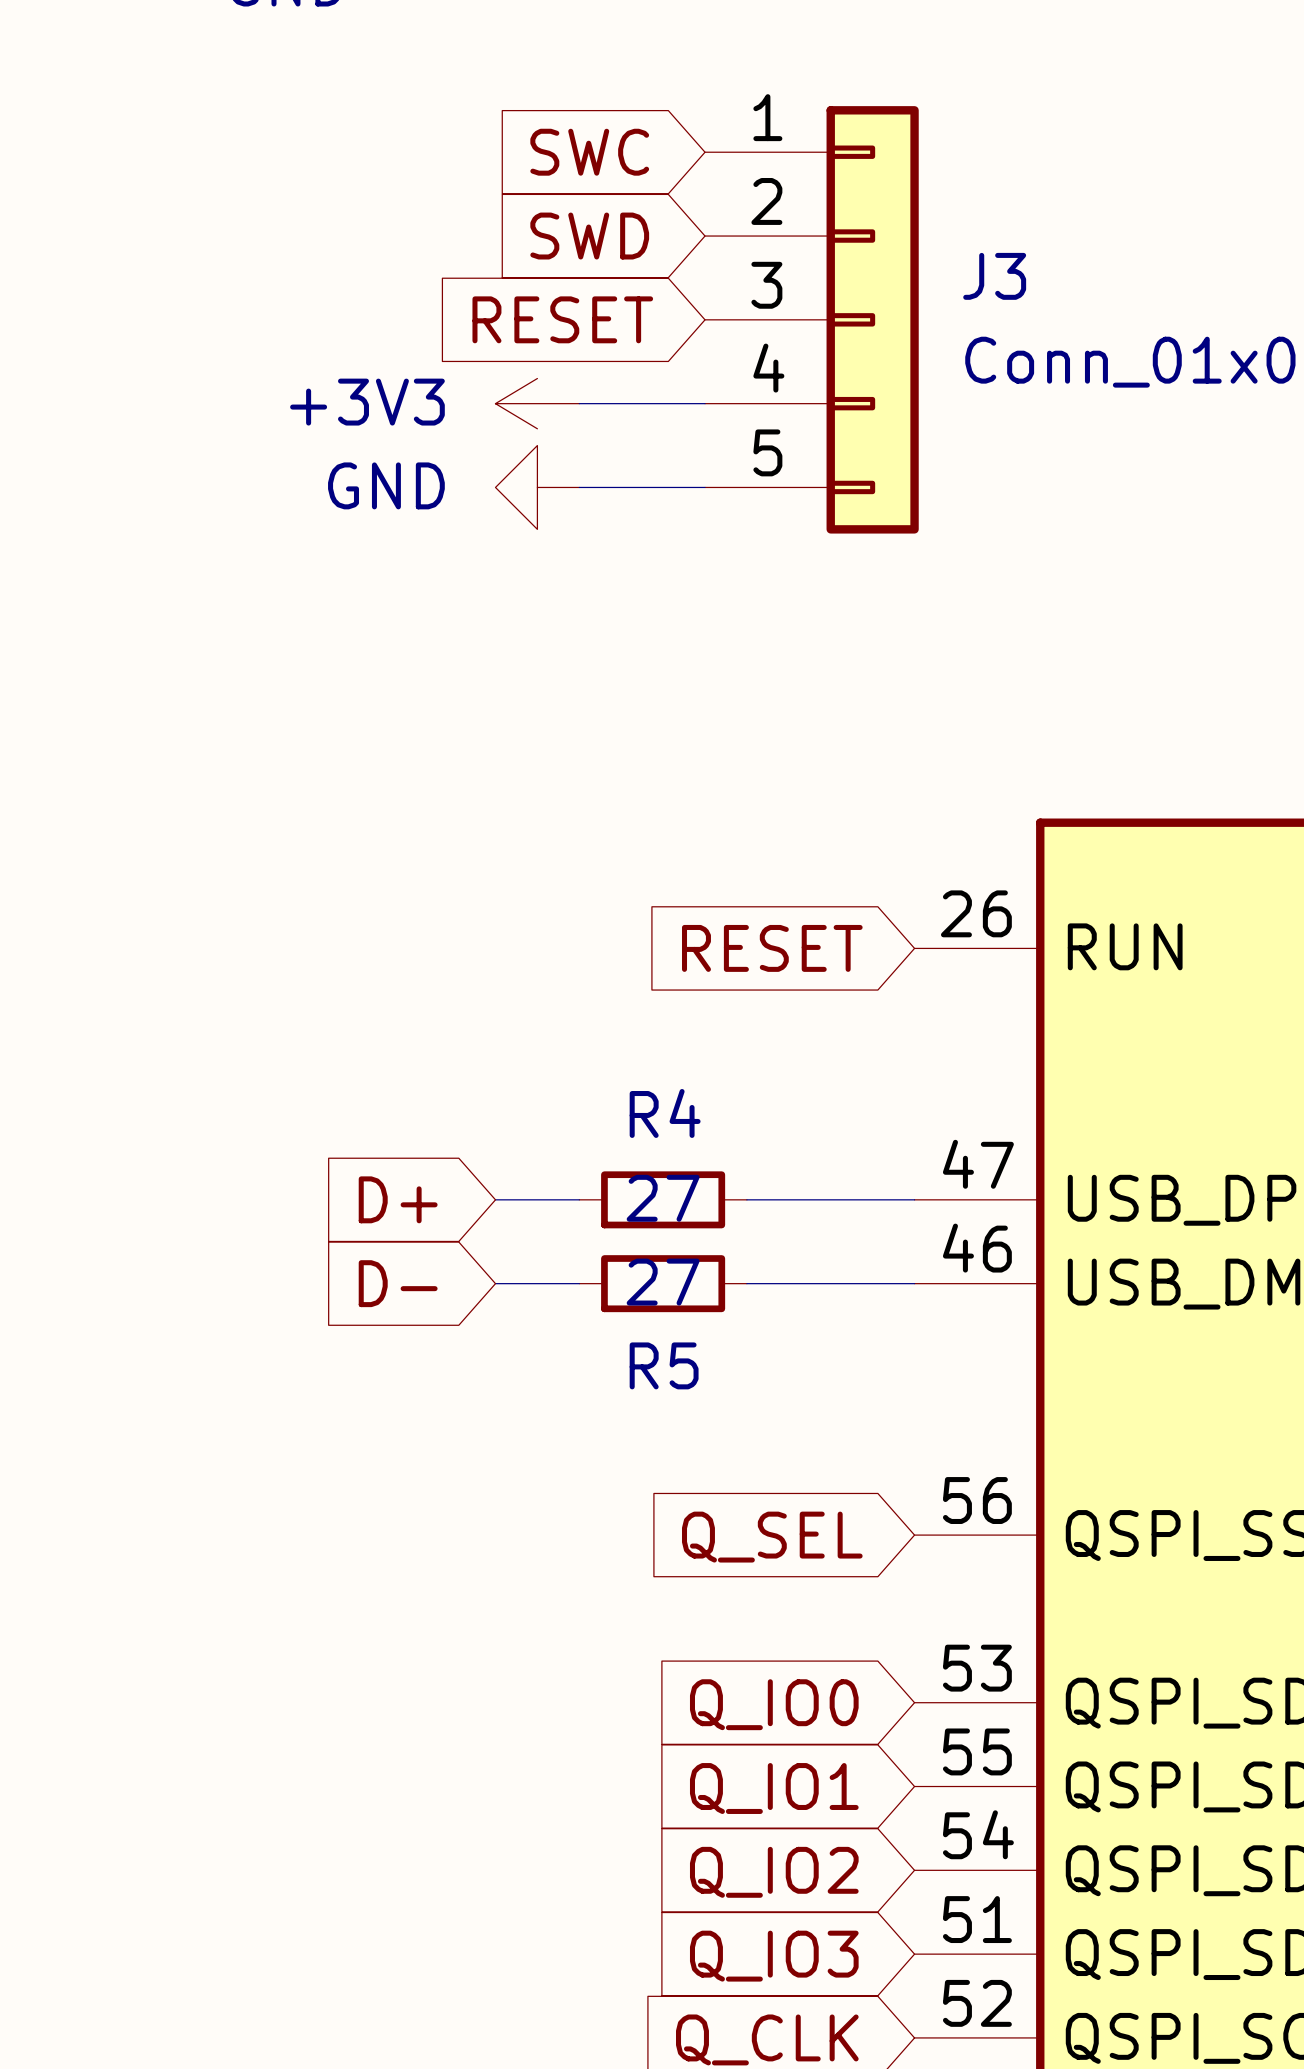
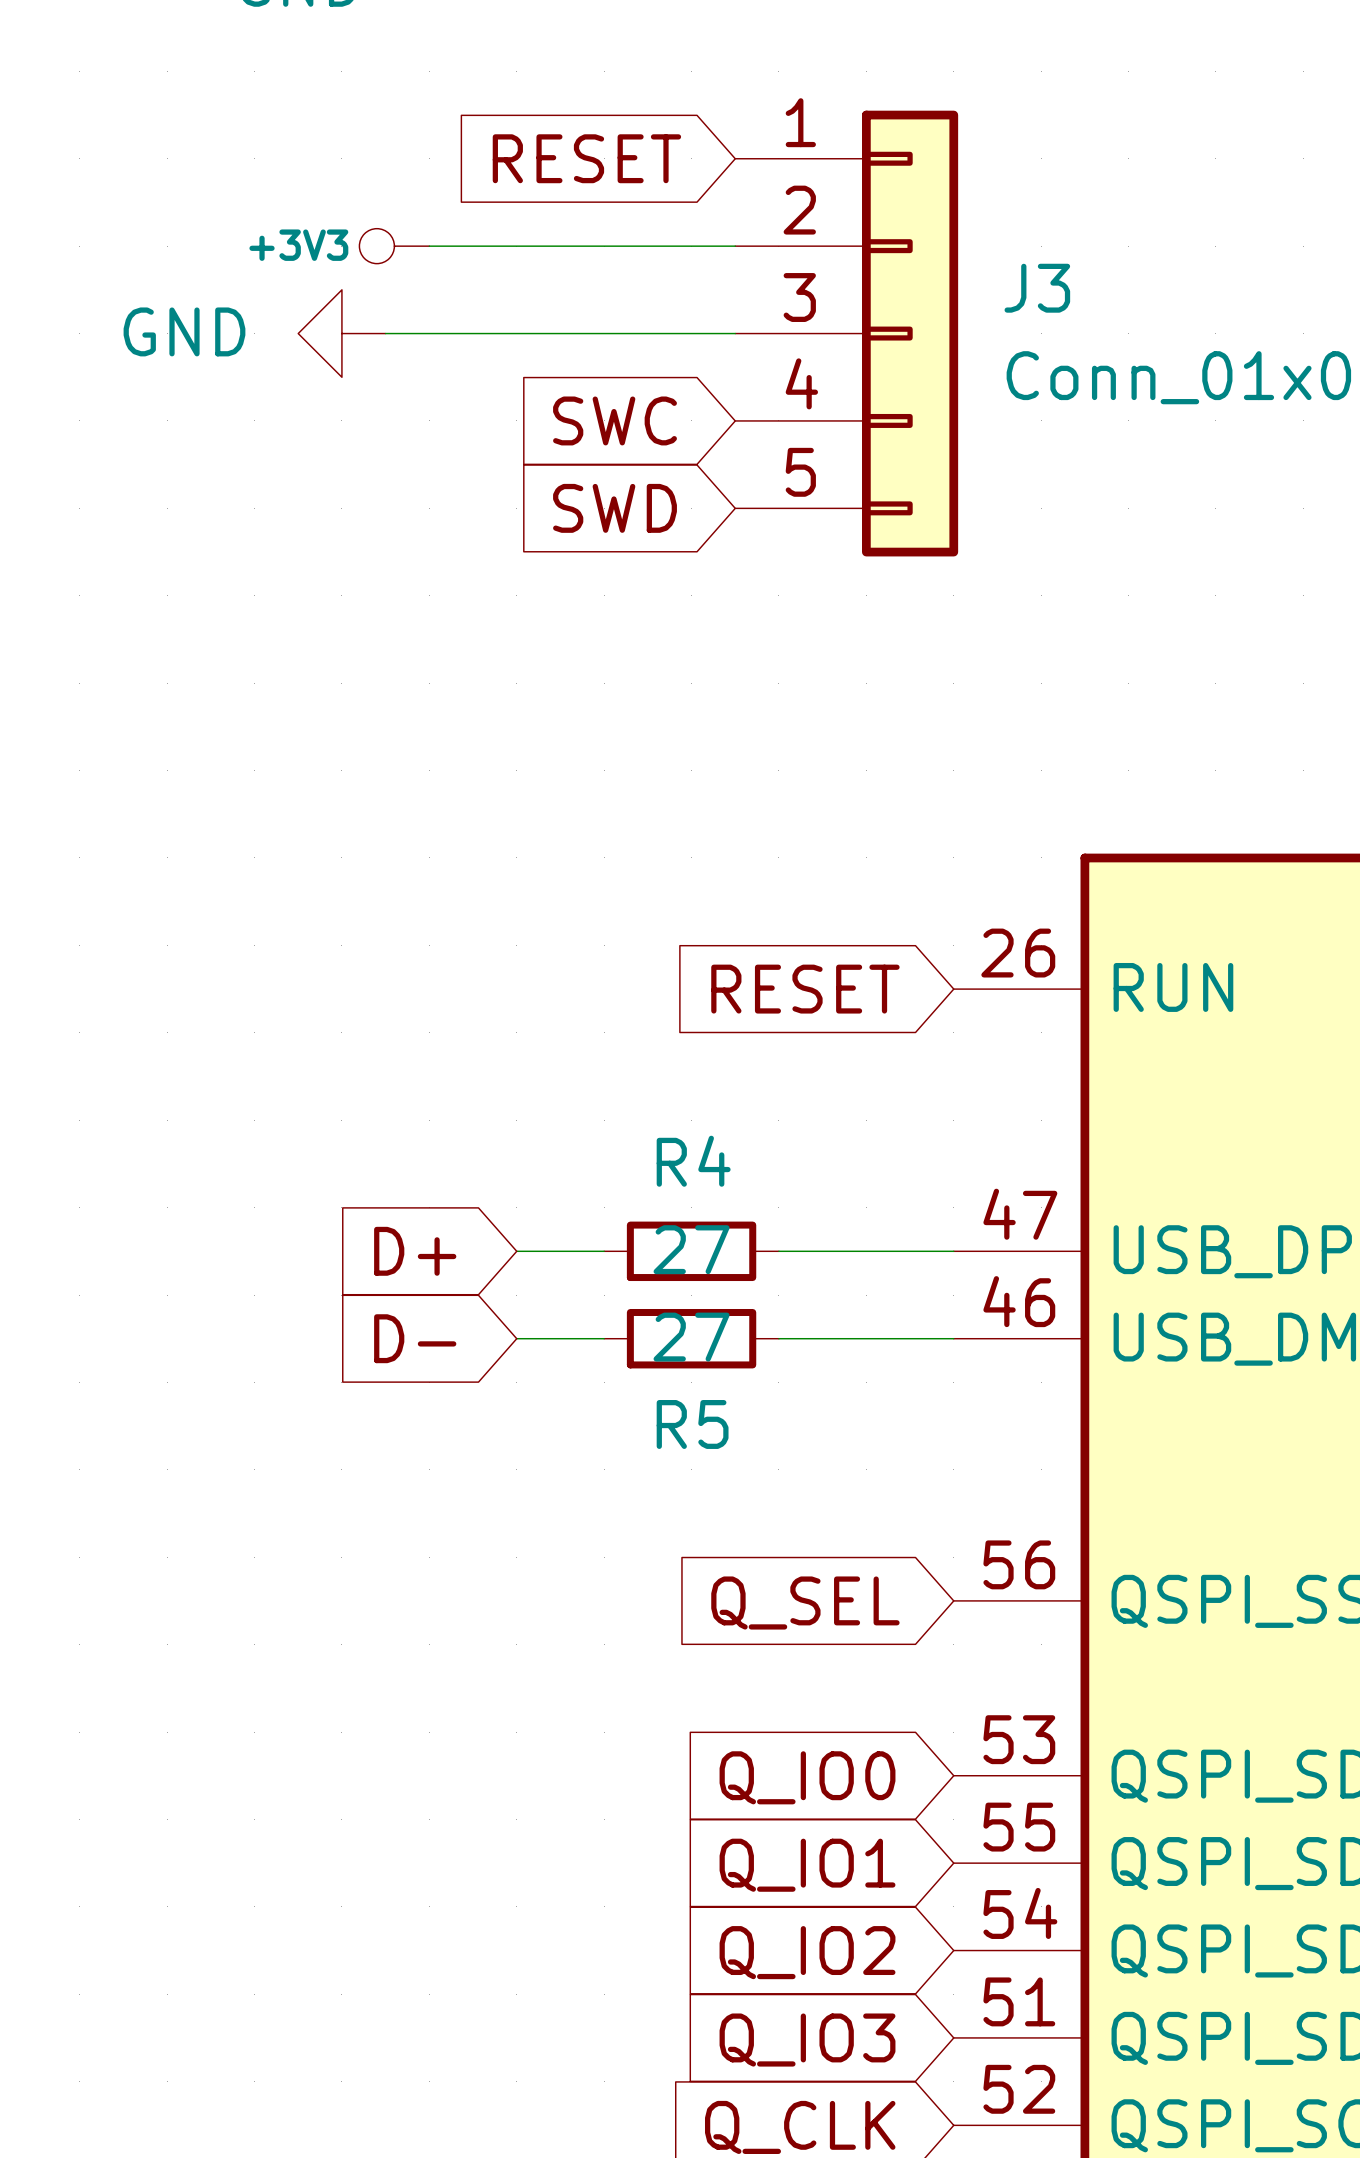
global label: SWC (589, 152) -> RESET (586, 158)
power symbol: none -> +3V3 (394, 246)
wire: none -> (429, 246) (735, 246)
global label position: SWD (589, 236) -> SWD (615, 508)
wire: none -> (385, 333) (735, 333)
global label: RESET (562, 319) -> none
power symbol: +3V3 (537, 403) -> none
wire: (579, 403) (705, 403) -> none
global label: none -> SWC (615, 420)
power symbol position: GND (537, 487) -> GND (341, 333)
wire: (579, 487) (705, 487) -> none

